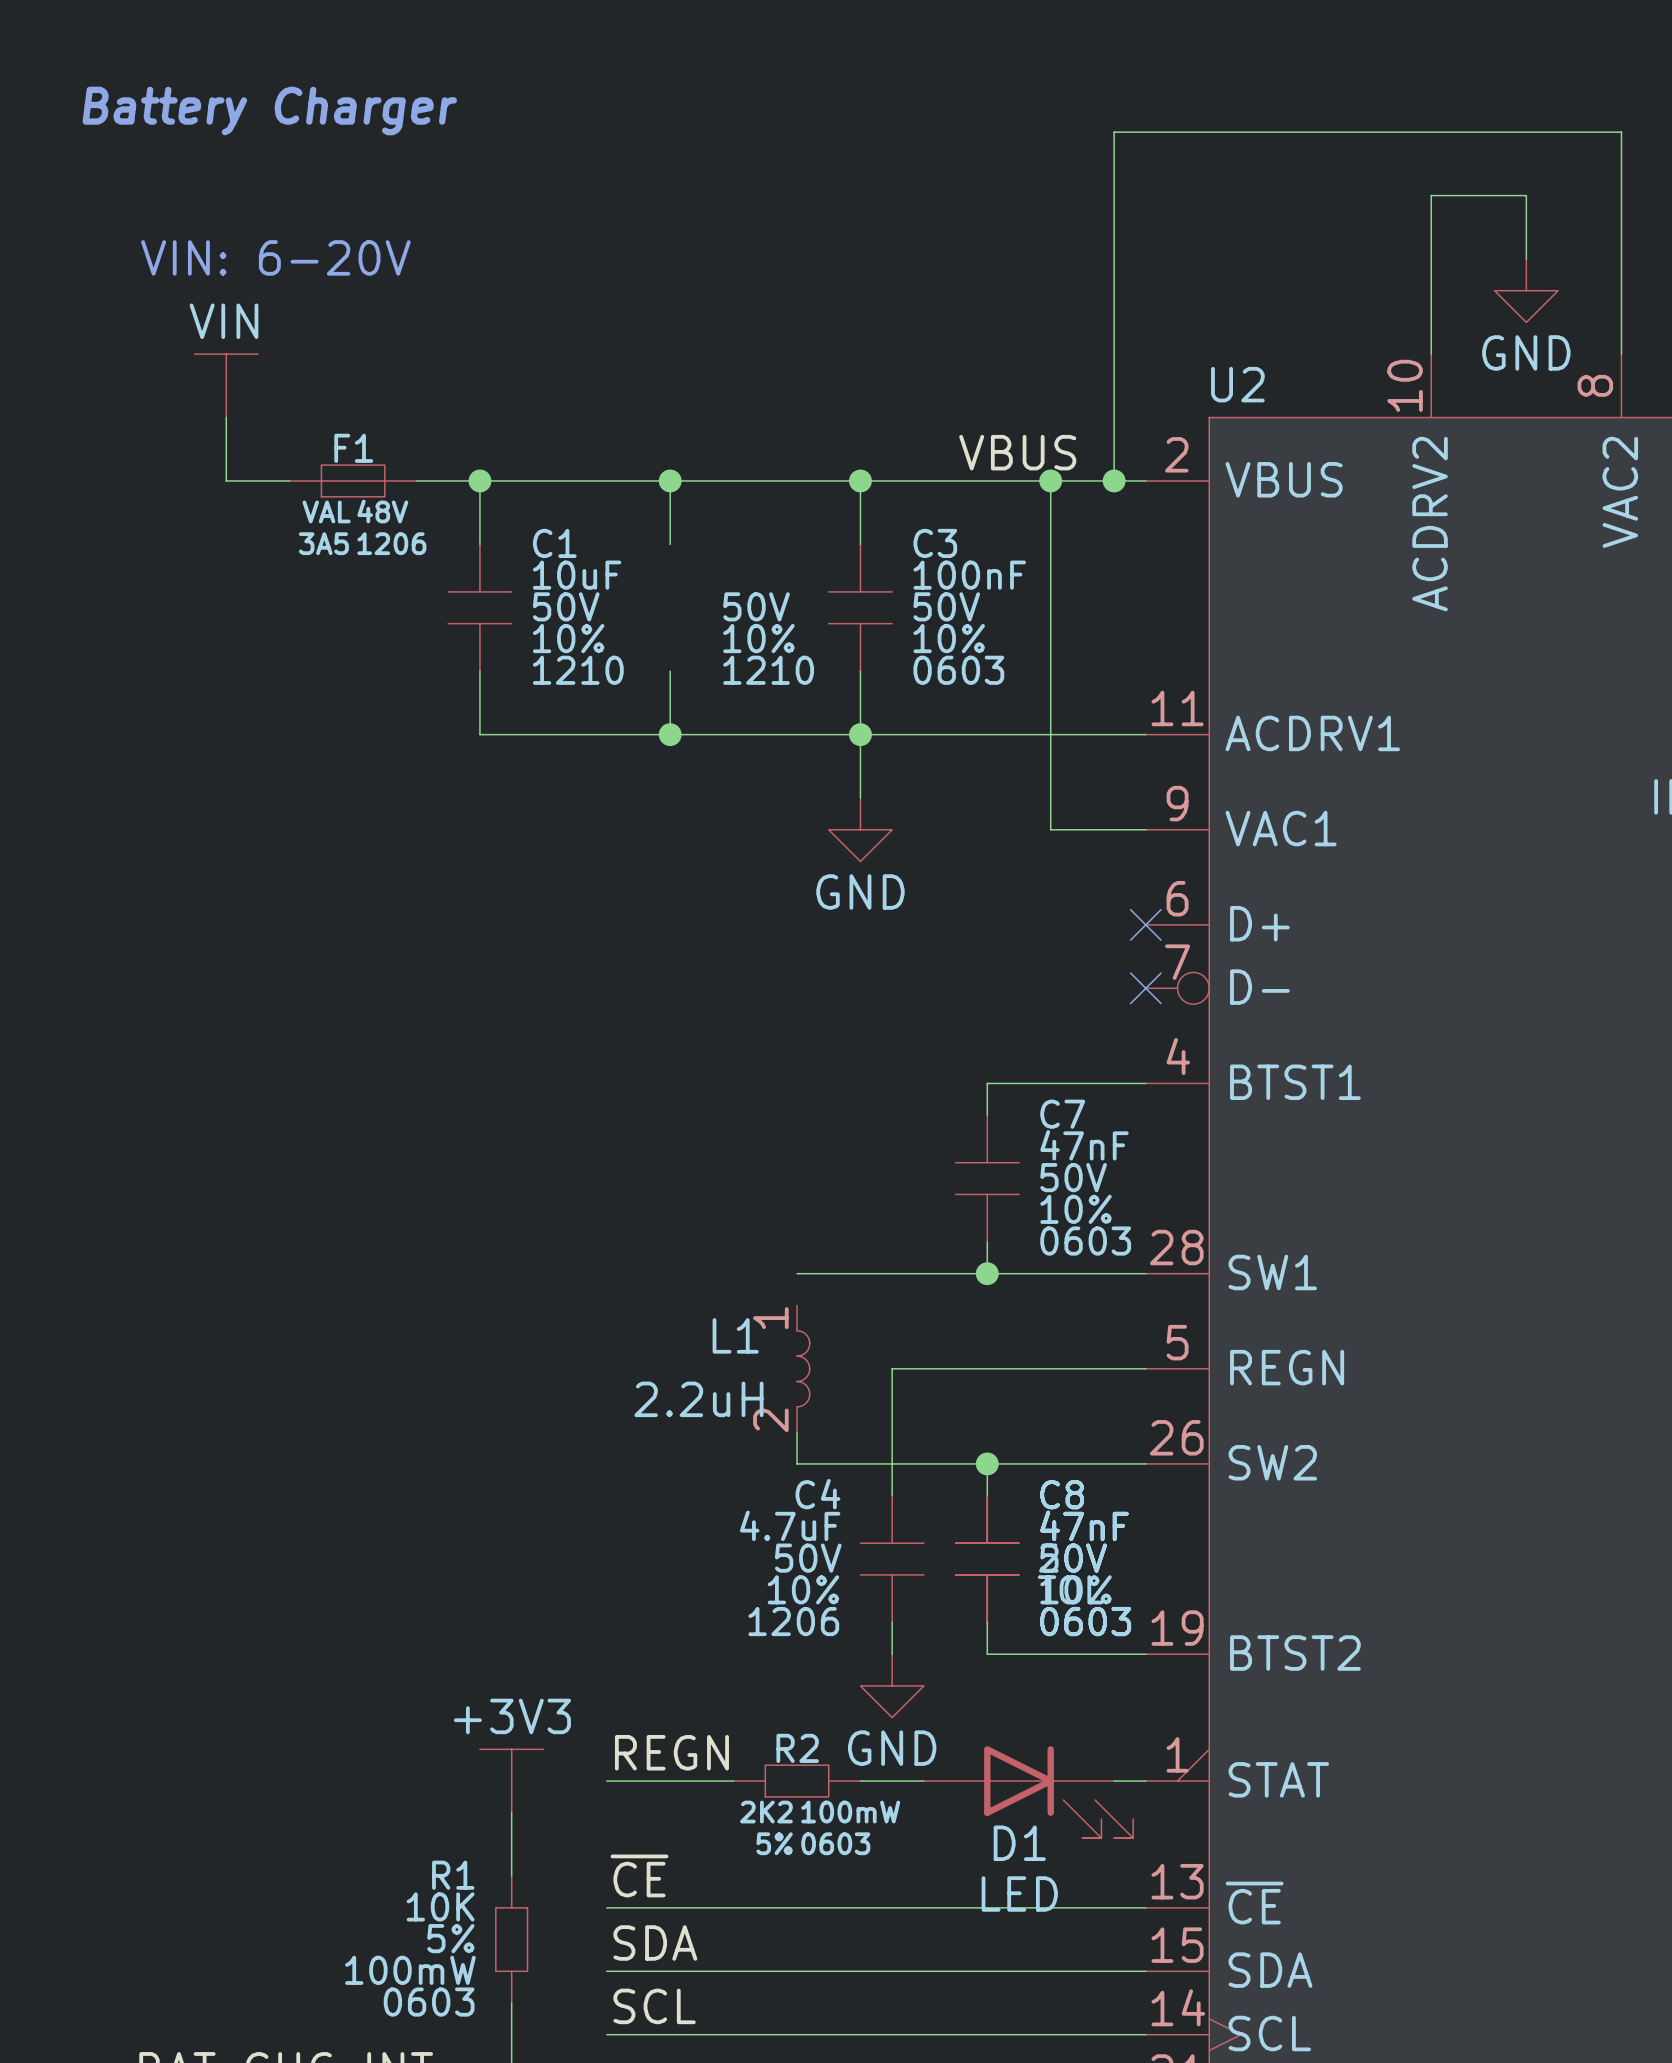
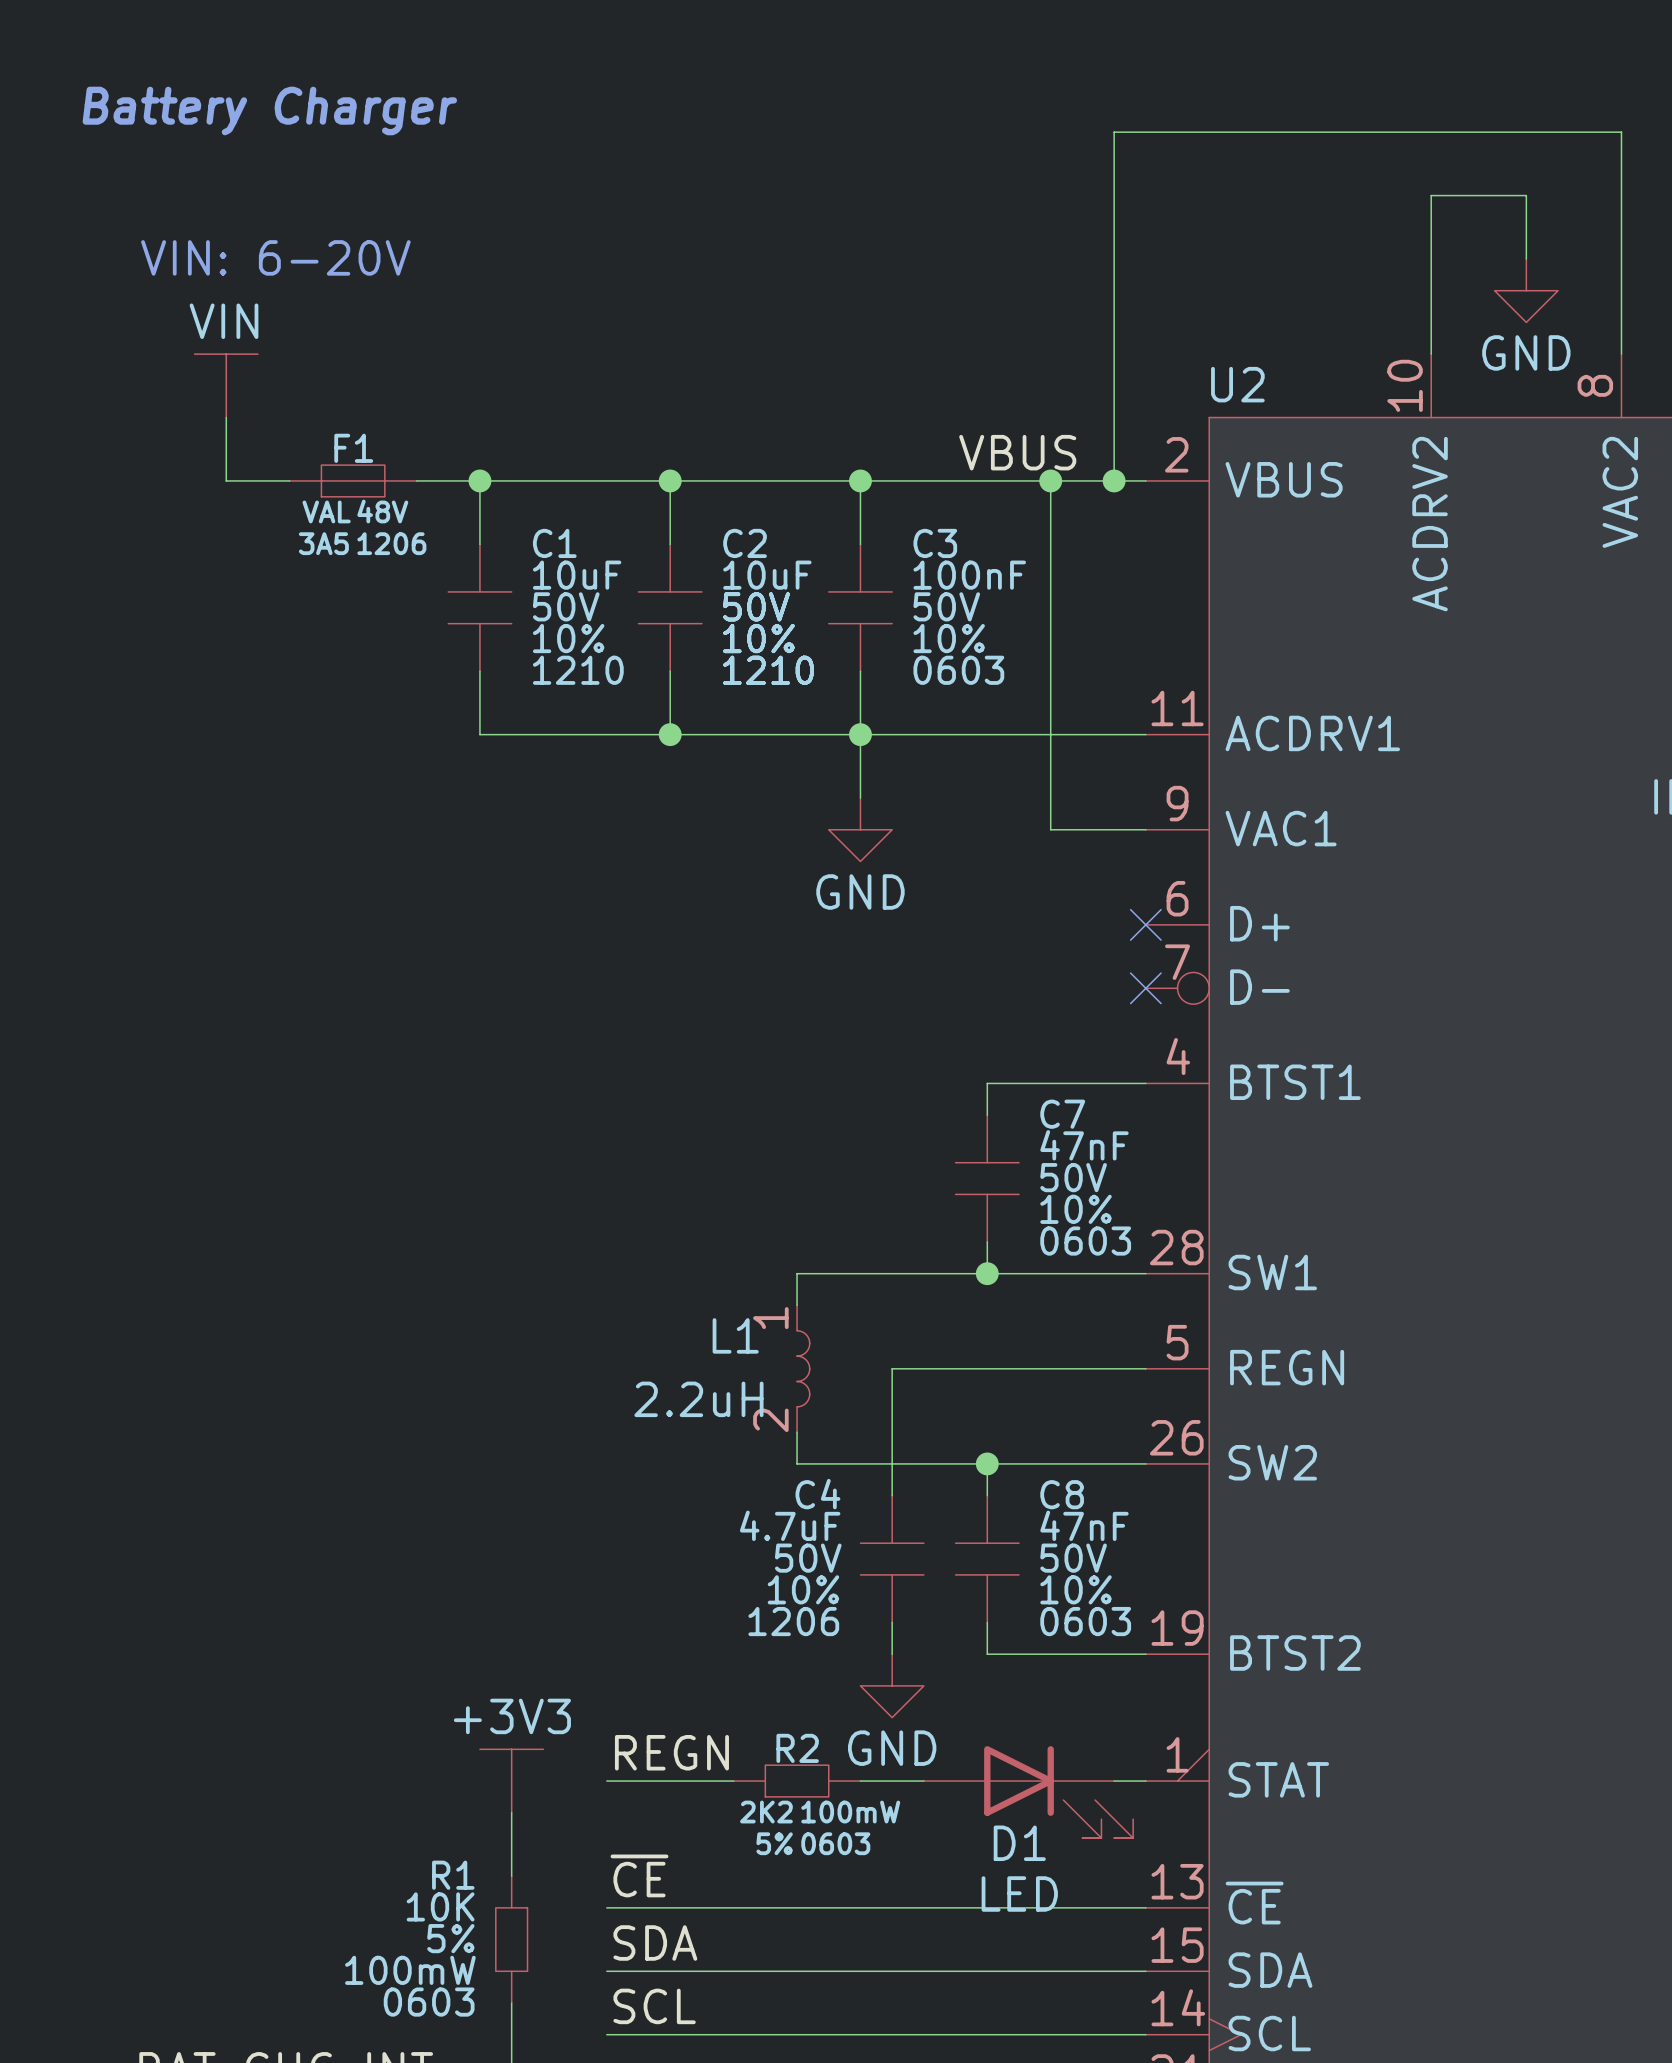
C2: none -> 10uF (670, 607)
wire: none -> (797, 1273) (797, 1305)
C8: 47nF (987, 1559) -> none

